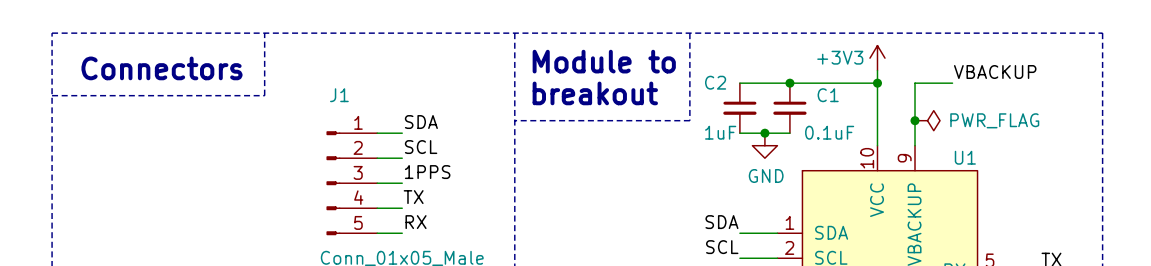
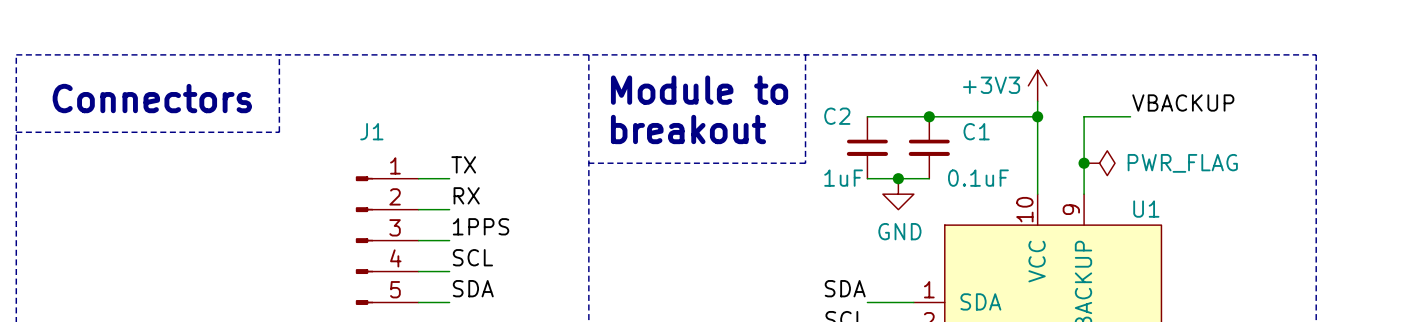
label: SDA (421, 122) -> TX (463, 164)
label: SCL (421, 147) -> RX (466, 195)
label: TX (413, 197) -> SCL (472, 257)
label: RX (416, 222) -> SDA (473, 288)

